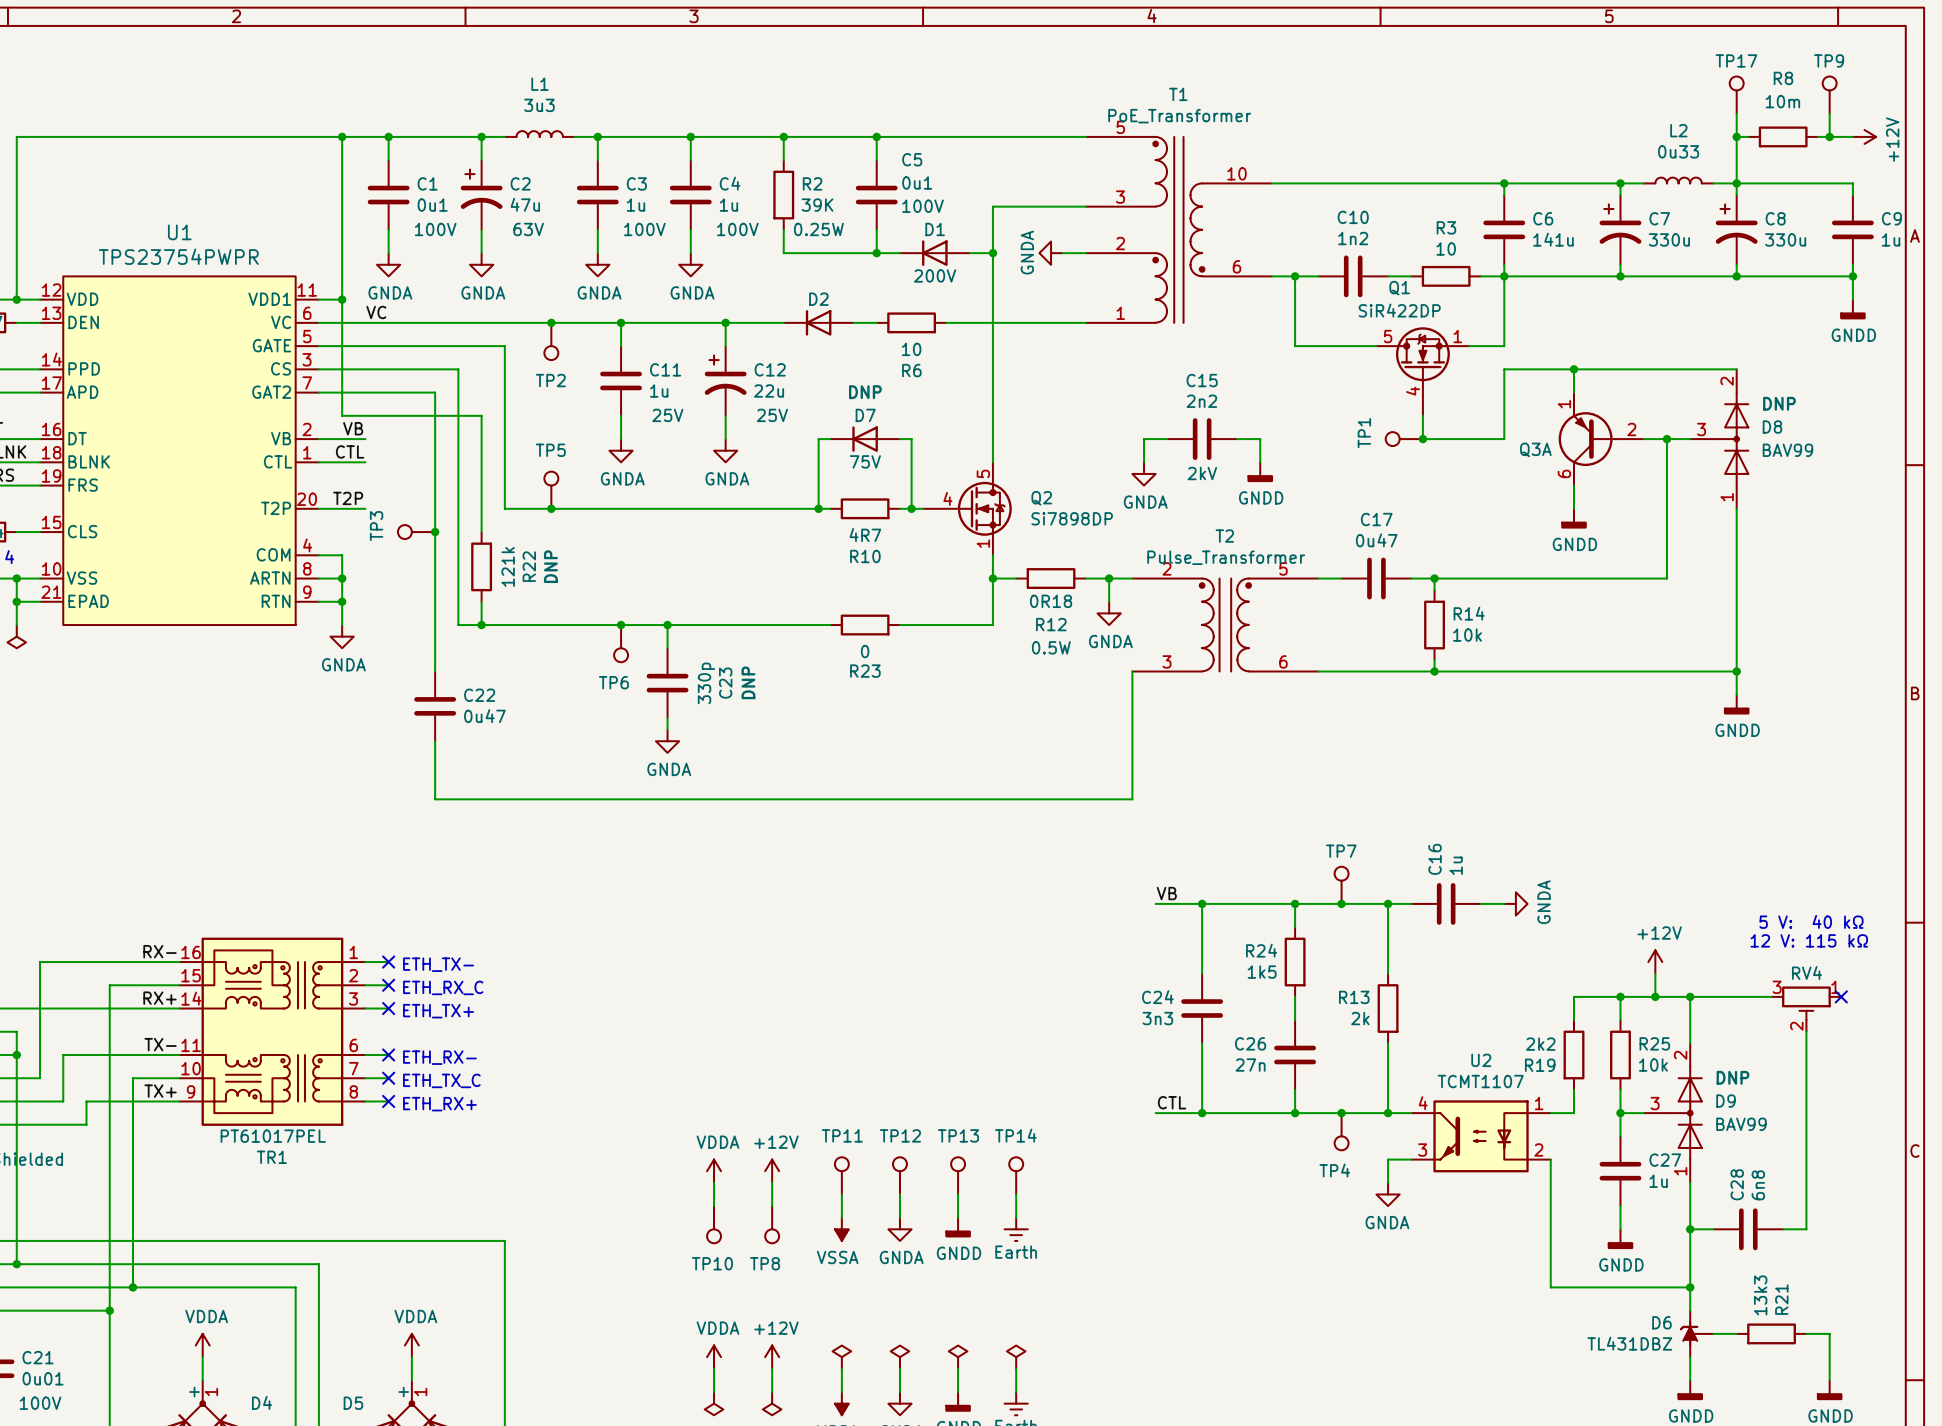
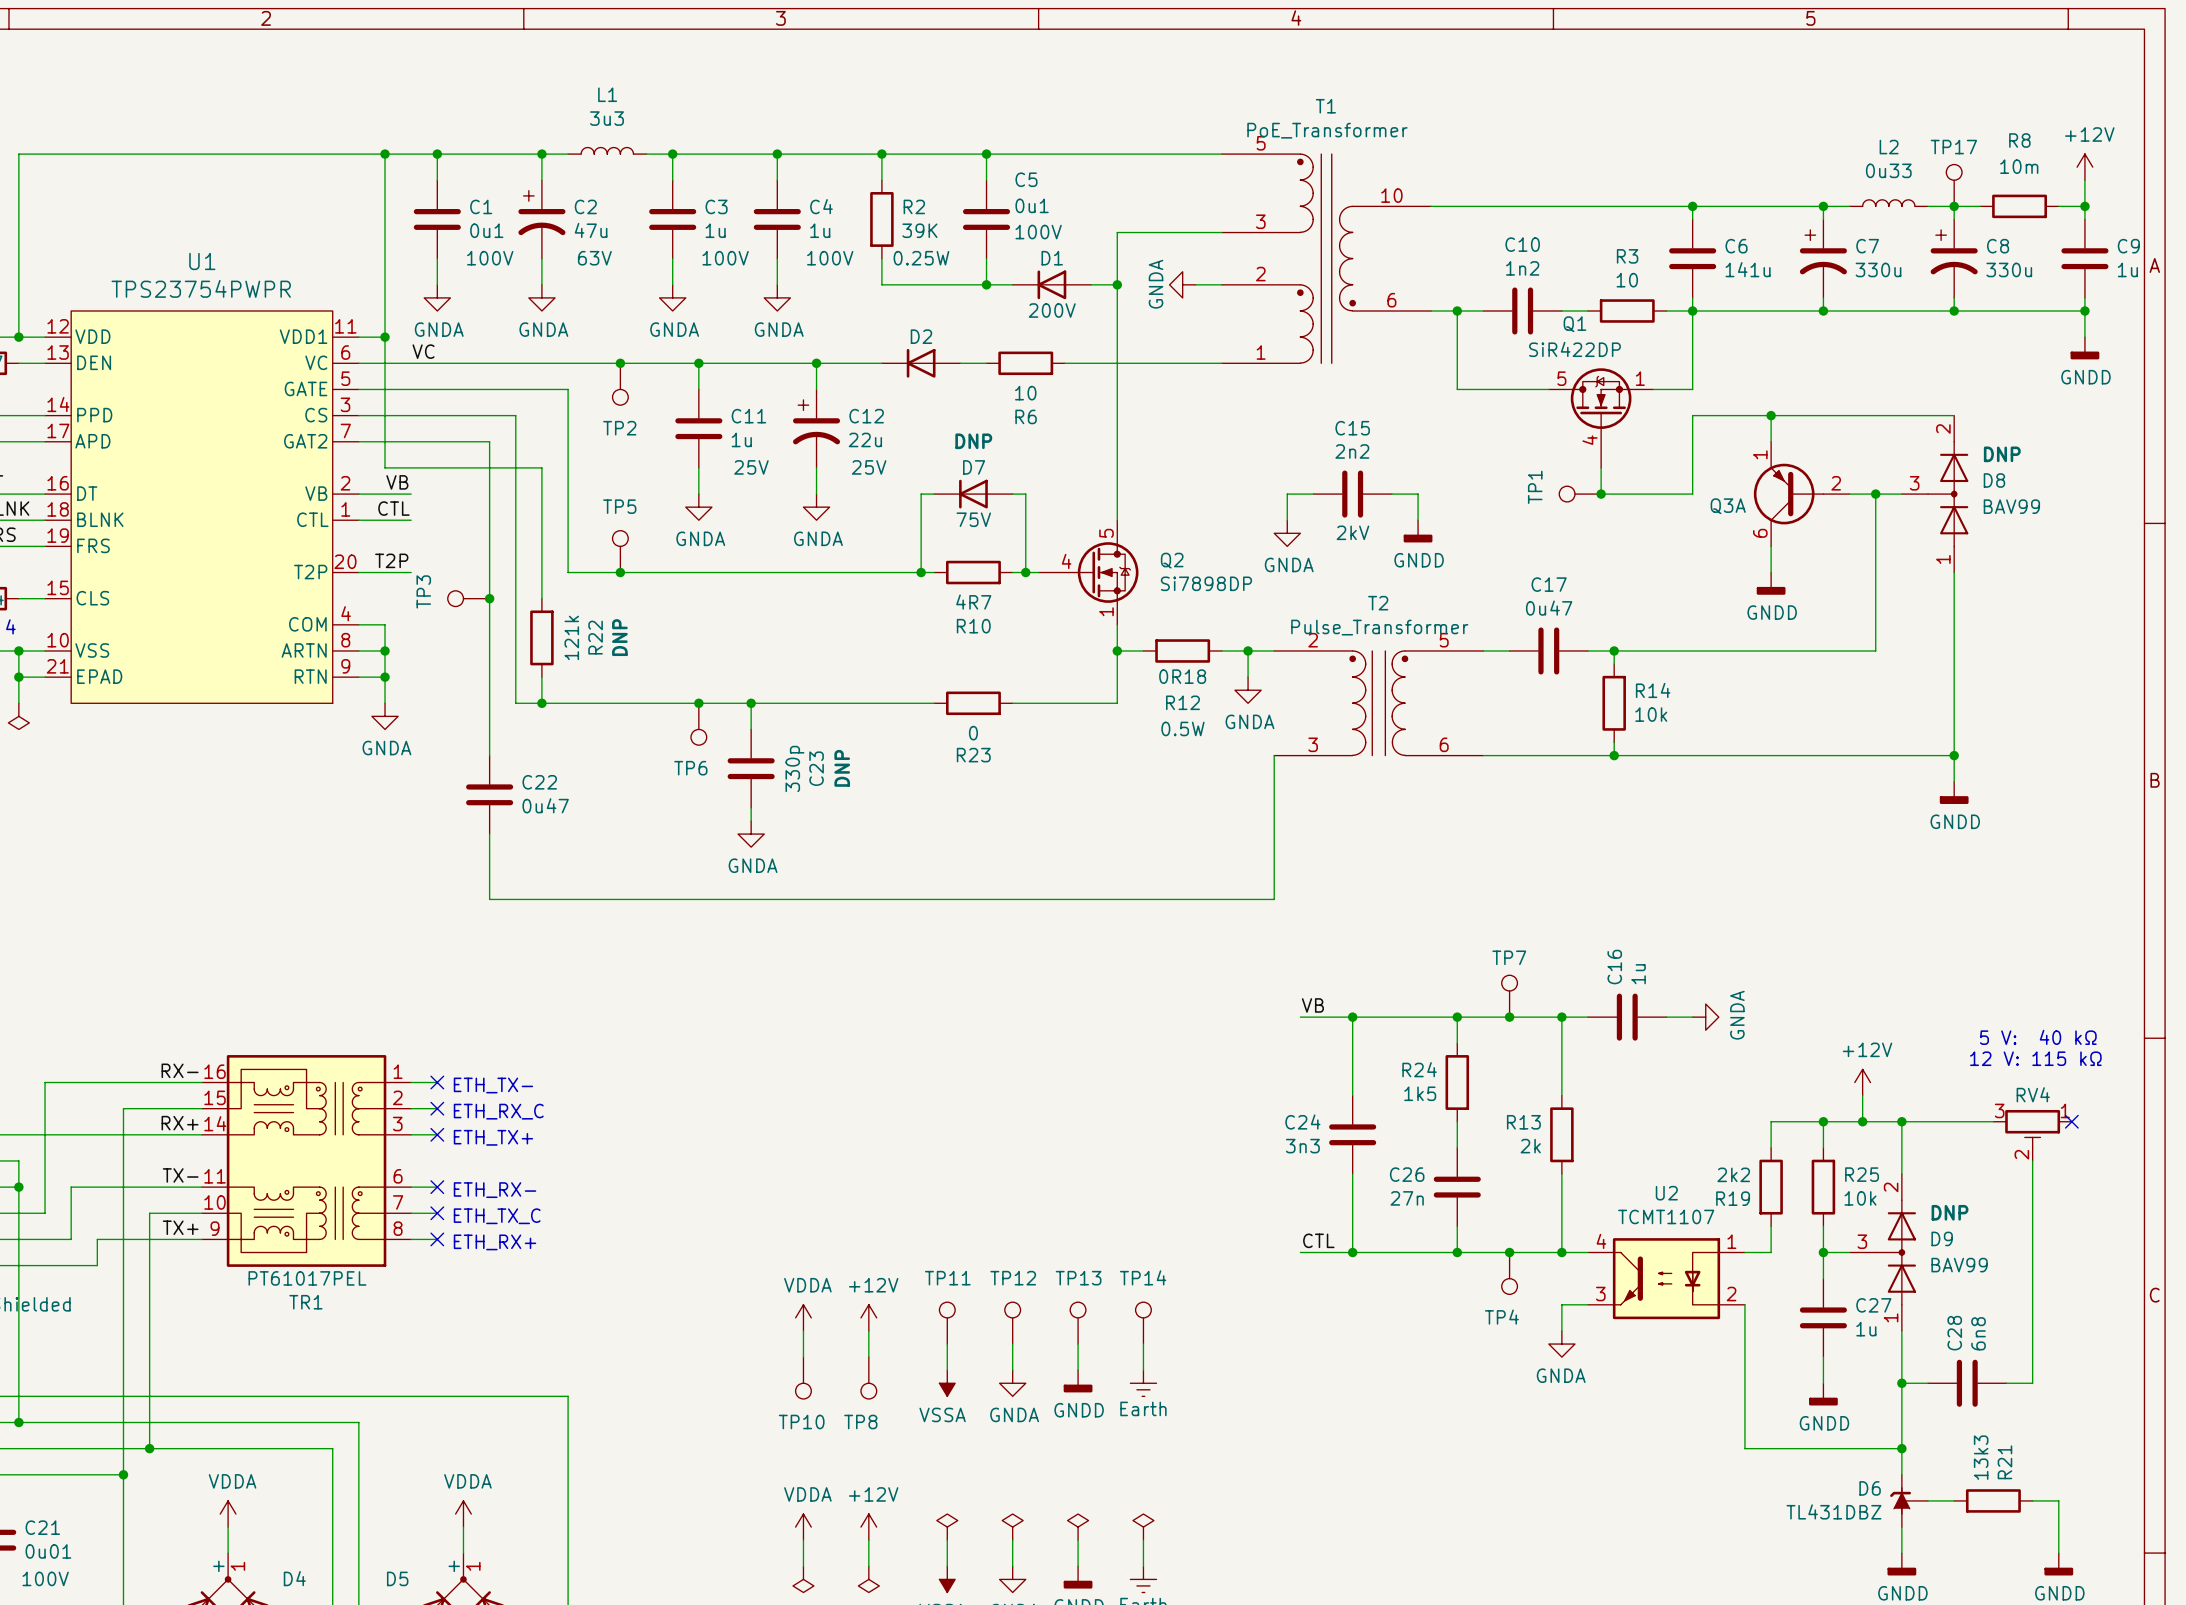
TP17 position: (1736, 95) -> (1954, 185)
TP9: (1829, 95) -> none
wire: (1736, 113) (1736, 183) -> none
wire: (1829, 113) (1829, 136) -> (2084, 180) (2084, 206)
junction: (1736, 136) -> none
R8 position: (1783, 136) -> (2019, 206)
wire: (1818, 136) (1852, 136) -> none
junction position: (1829, 136) -> (2084, 206)
power symbol rotation: 0° (1864, 136) -> 90° counterclockwise (2084, 167)
power symbol position: +12V (1864, 136) -> +12V (2084, 167)
wire: (1759, 183) (1829, 183) -> none

